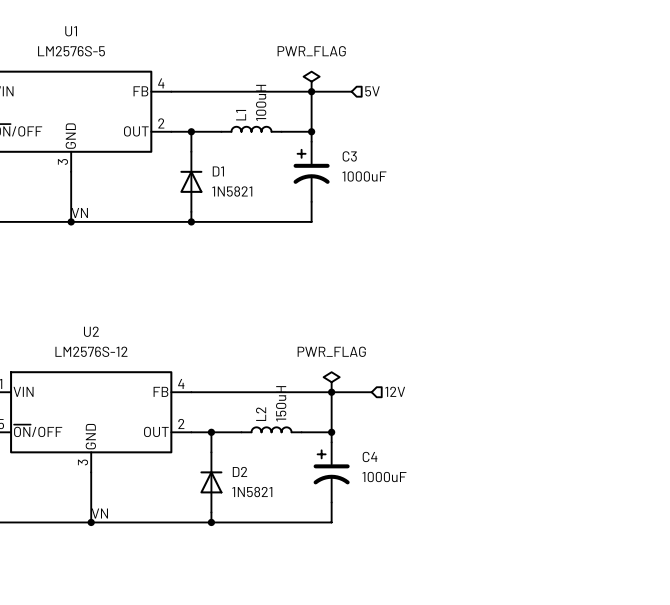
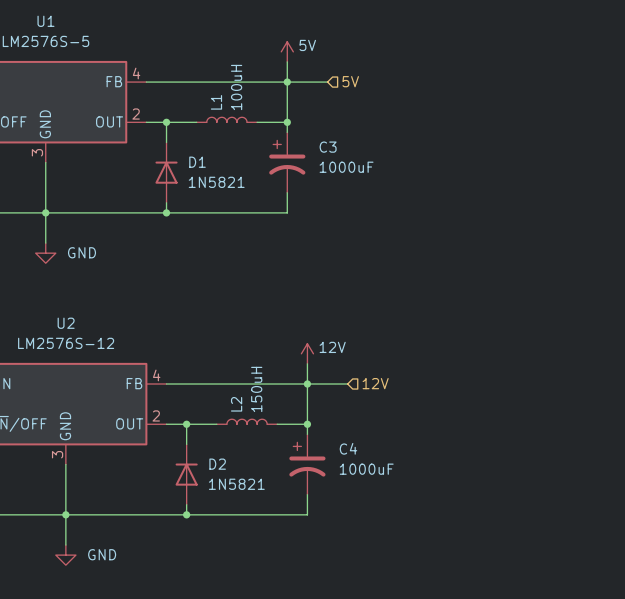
power symbol: none -> 5V (287, 51)
power symbol: PWR_FLAG (311, 81) -> none
label: VN (79, 212) -> none
wire: none -> (45, 212) (45, 243)
power symbol: none -> GND (45, 253)
power symbol: none -> 12V (307, 353)
power symbol: PWR_FLAG (331, 382) -> none
label: VN (99, 513) -> none
wire: none -> (65, 514) (65, 545)
power symbol: none -> GND (65, 555)

